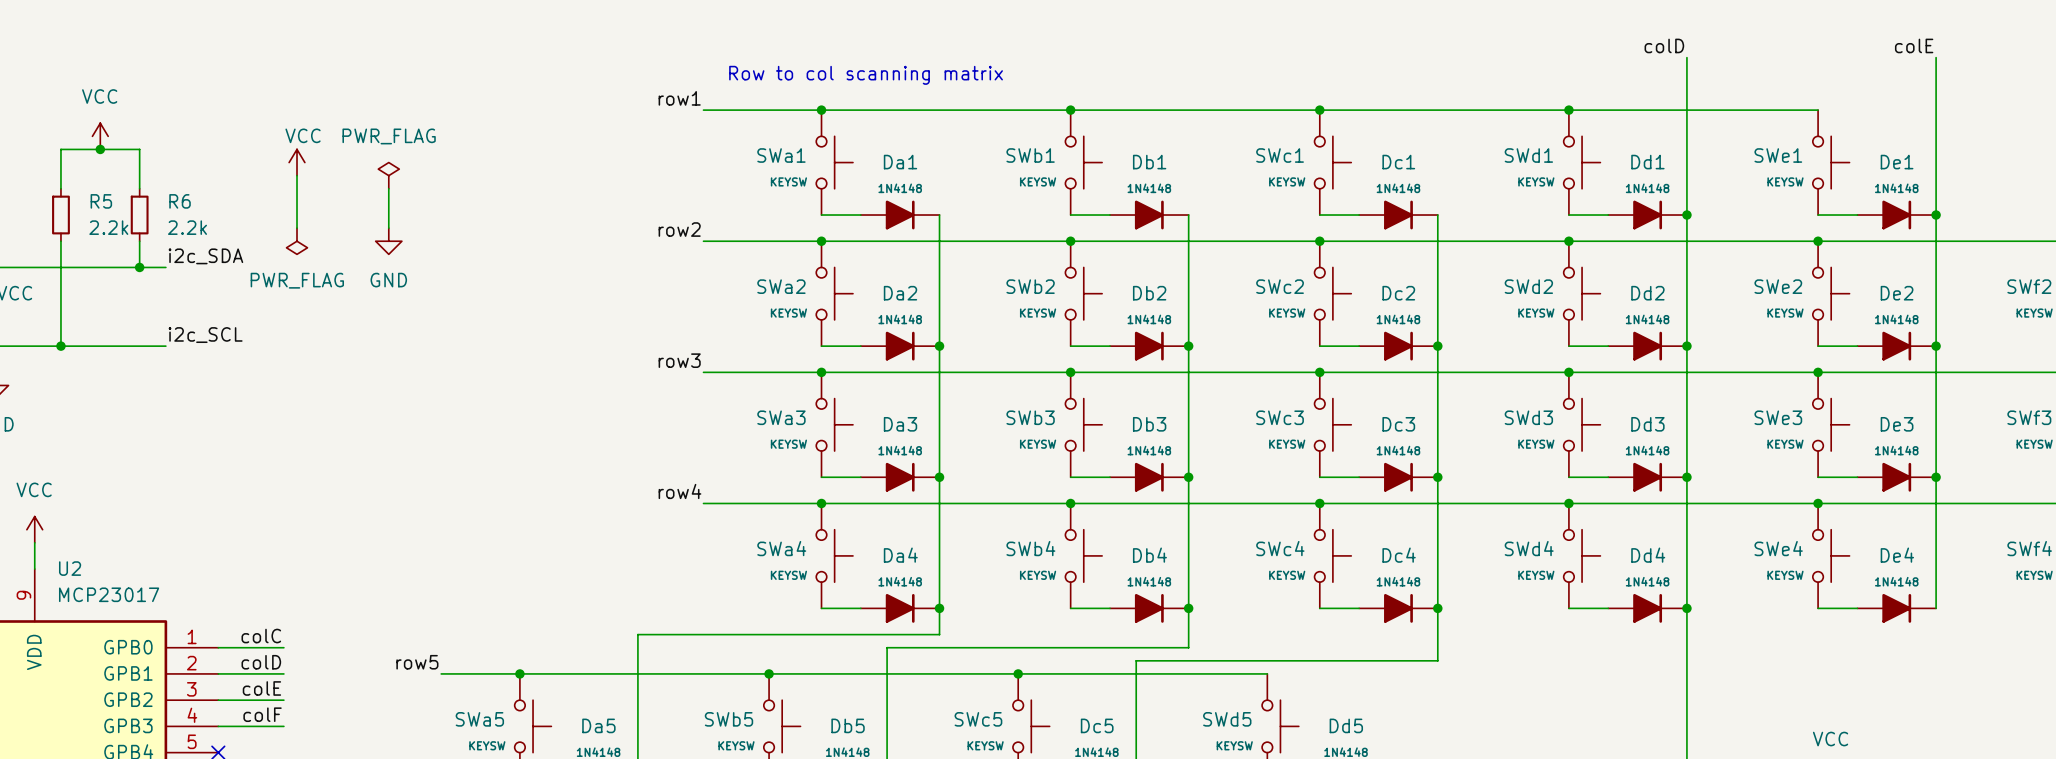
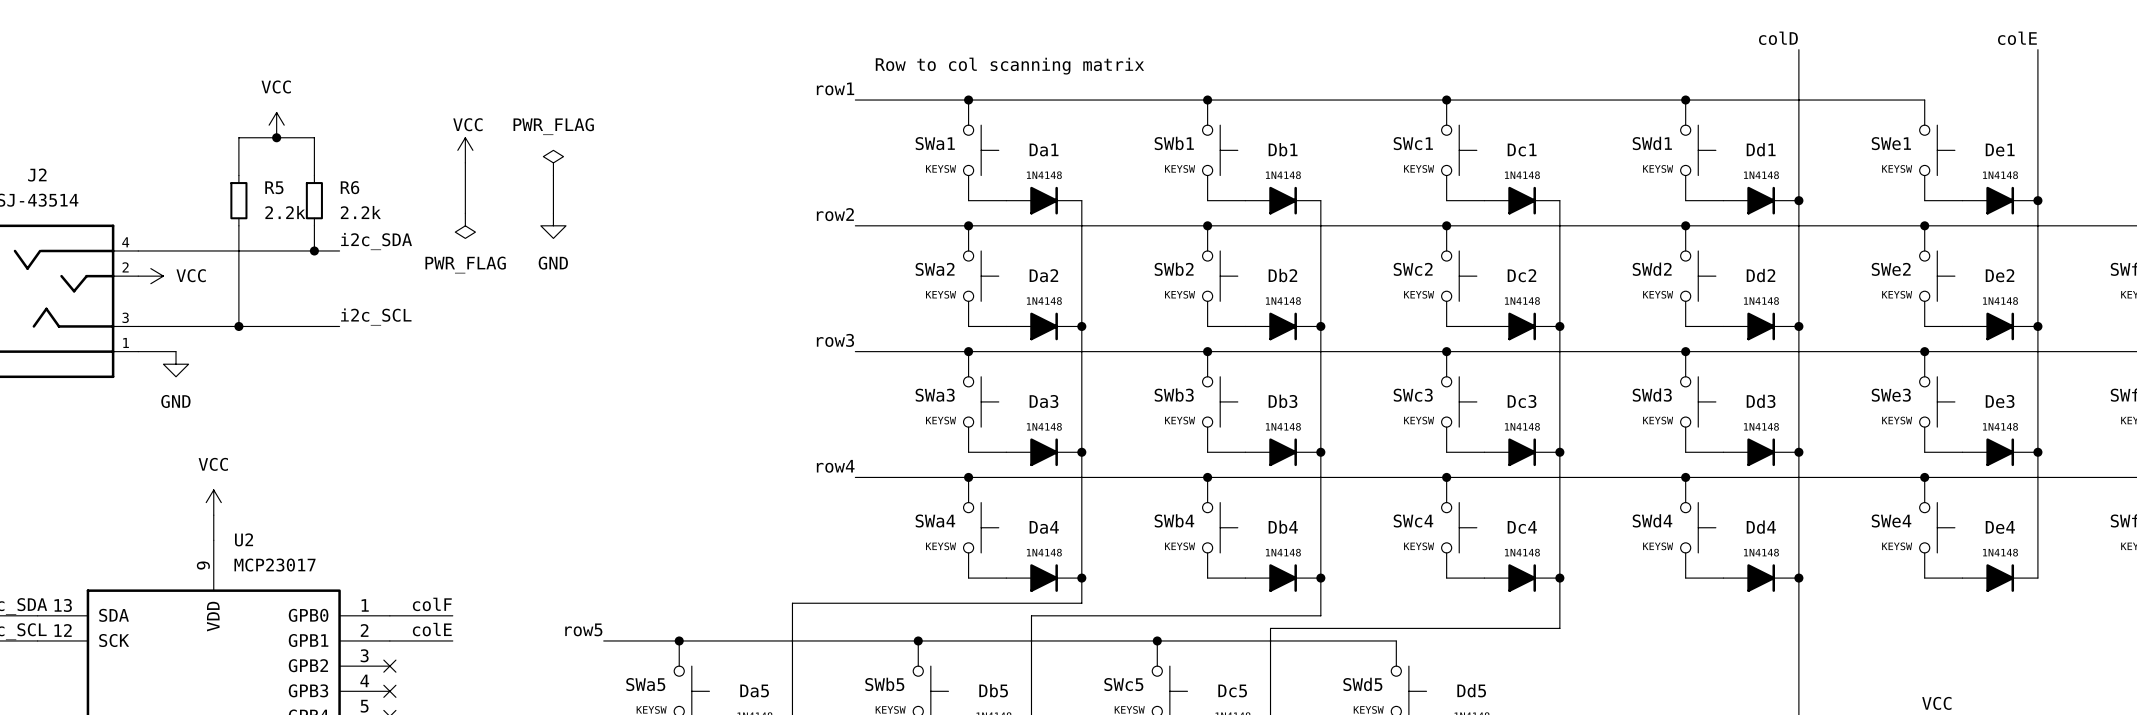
label: colC (261, 636) -> colF (432, 604)
label: colD (261, 662) -> colE (432, 629)
label: colE (261, 688) -> none
wire: (218, 700) (283, 700) -> none
no-connect mark: none -> (389, 666)
label: colF (262, 714) -> none
wire: (218, 726) (283, 726) -> none
no-connect mark: none -> (389, 691)

